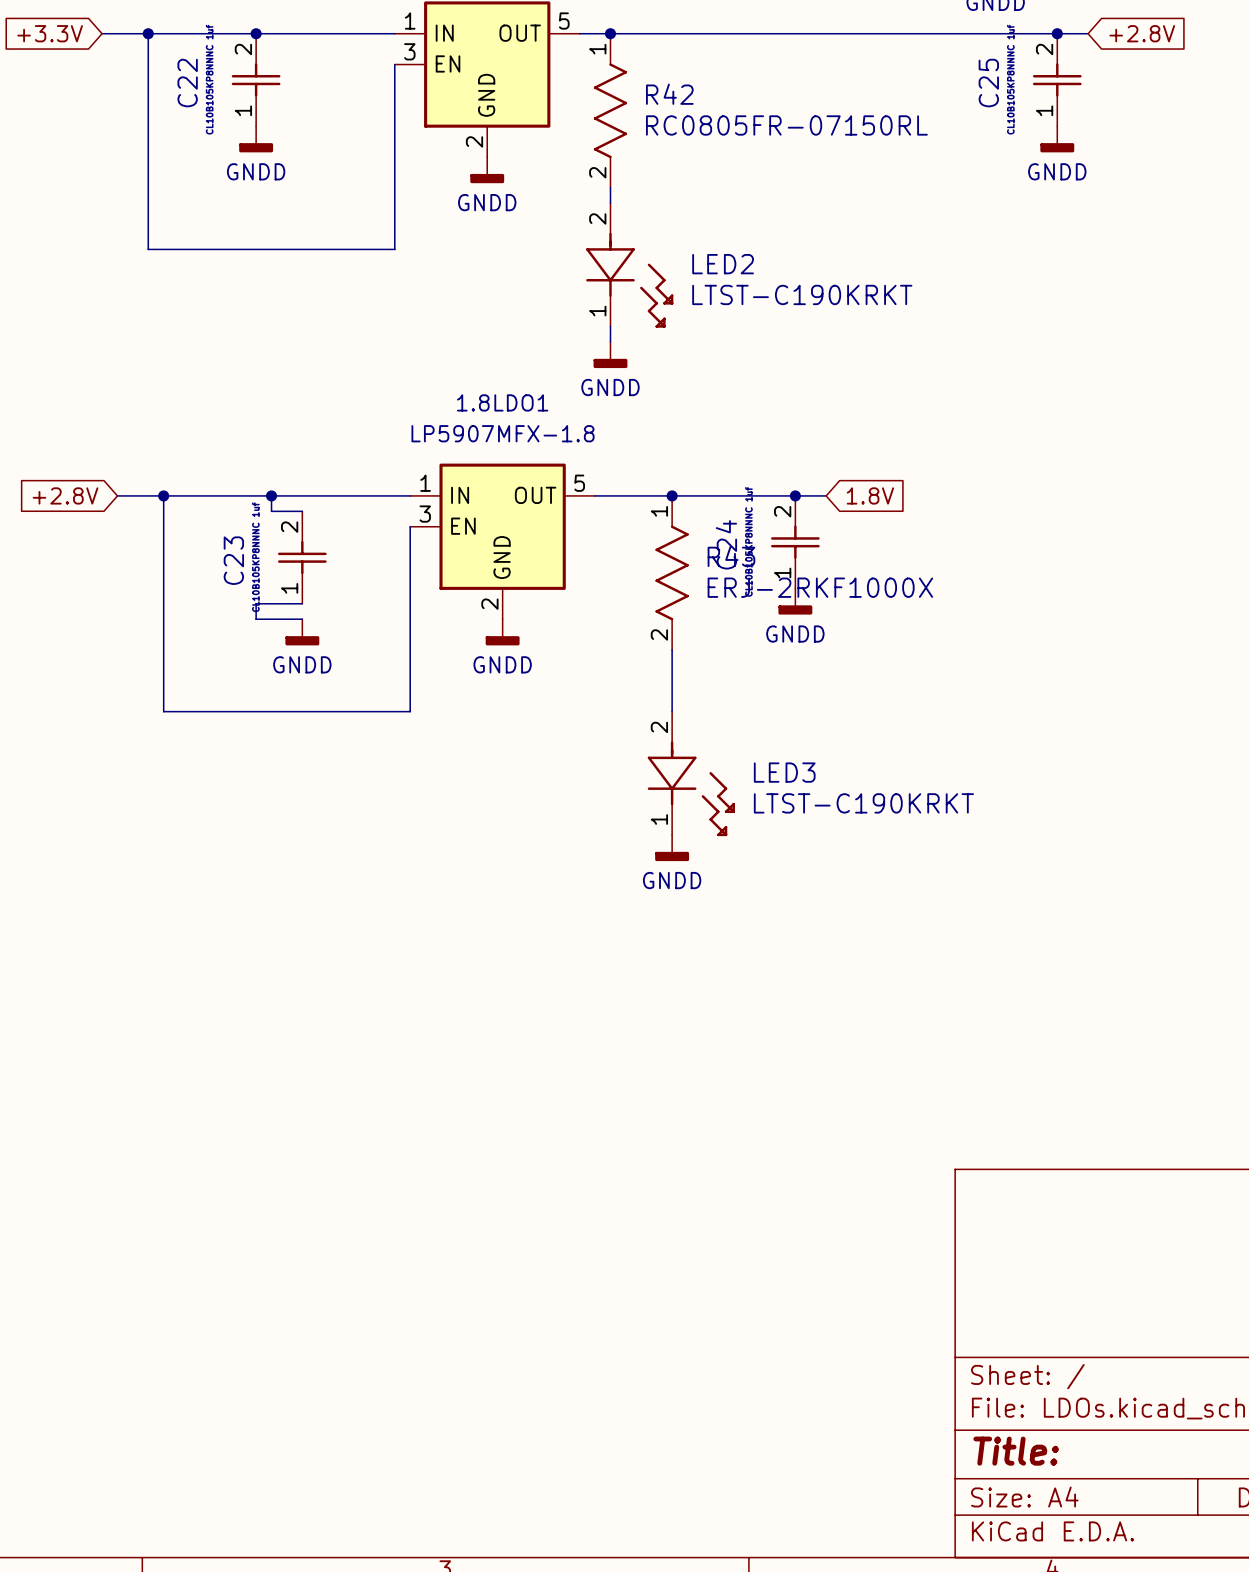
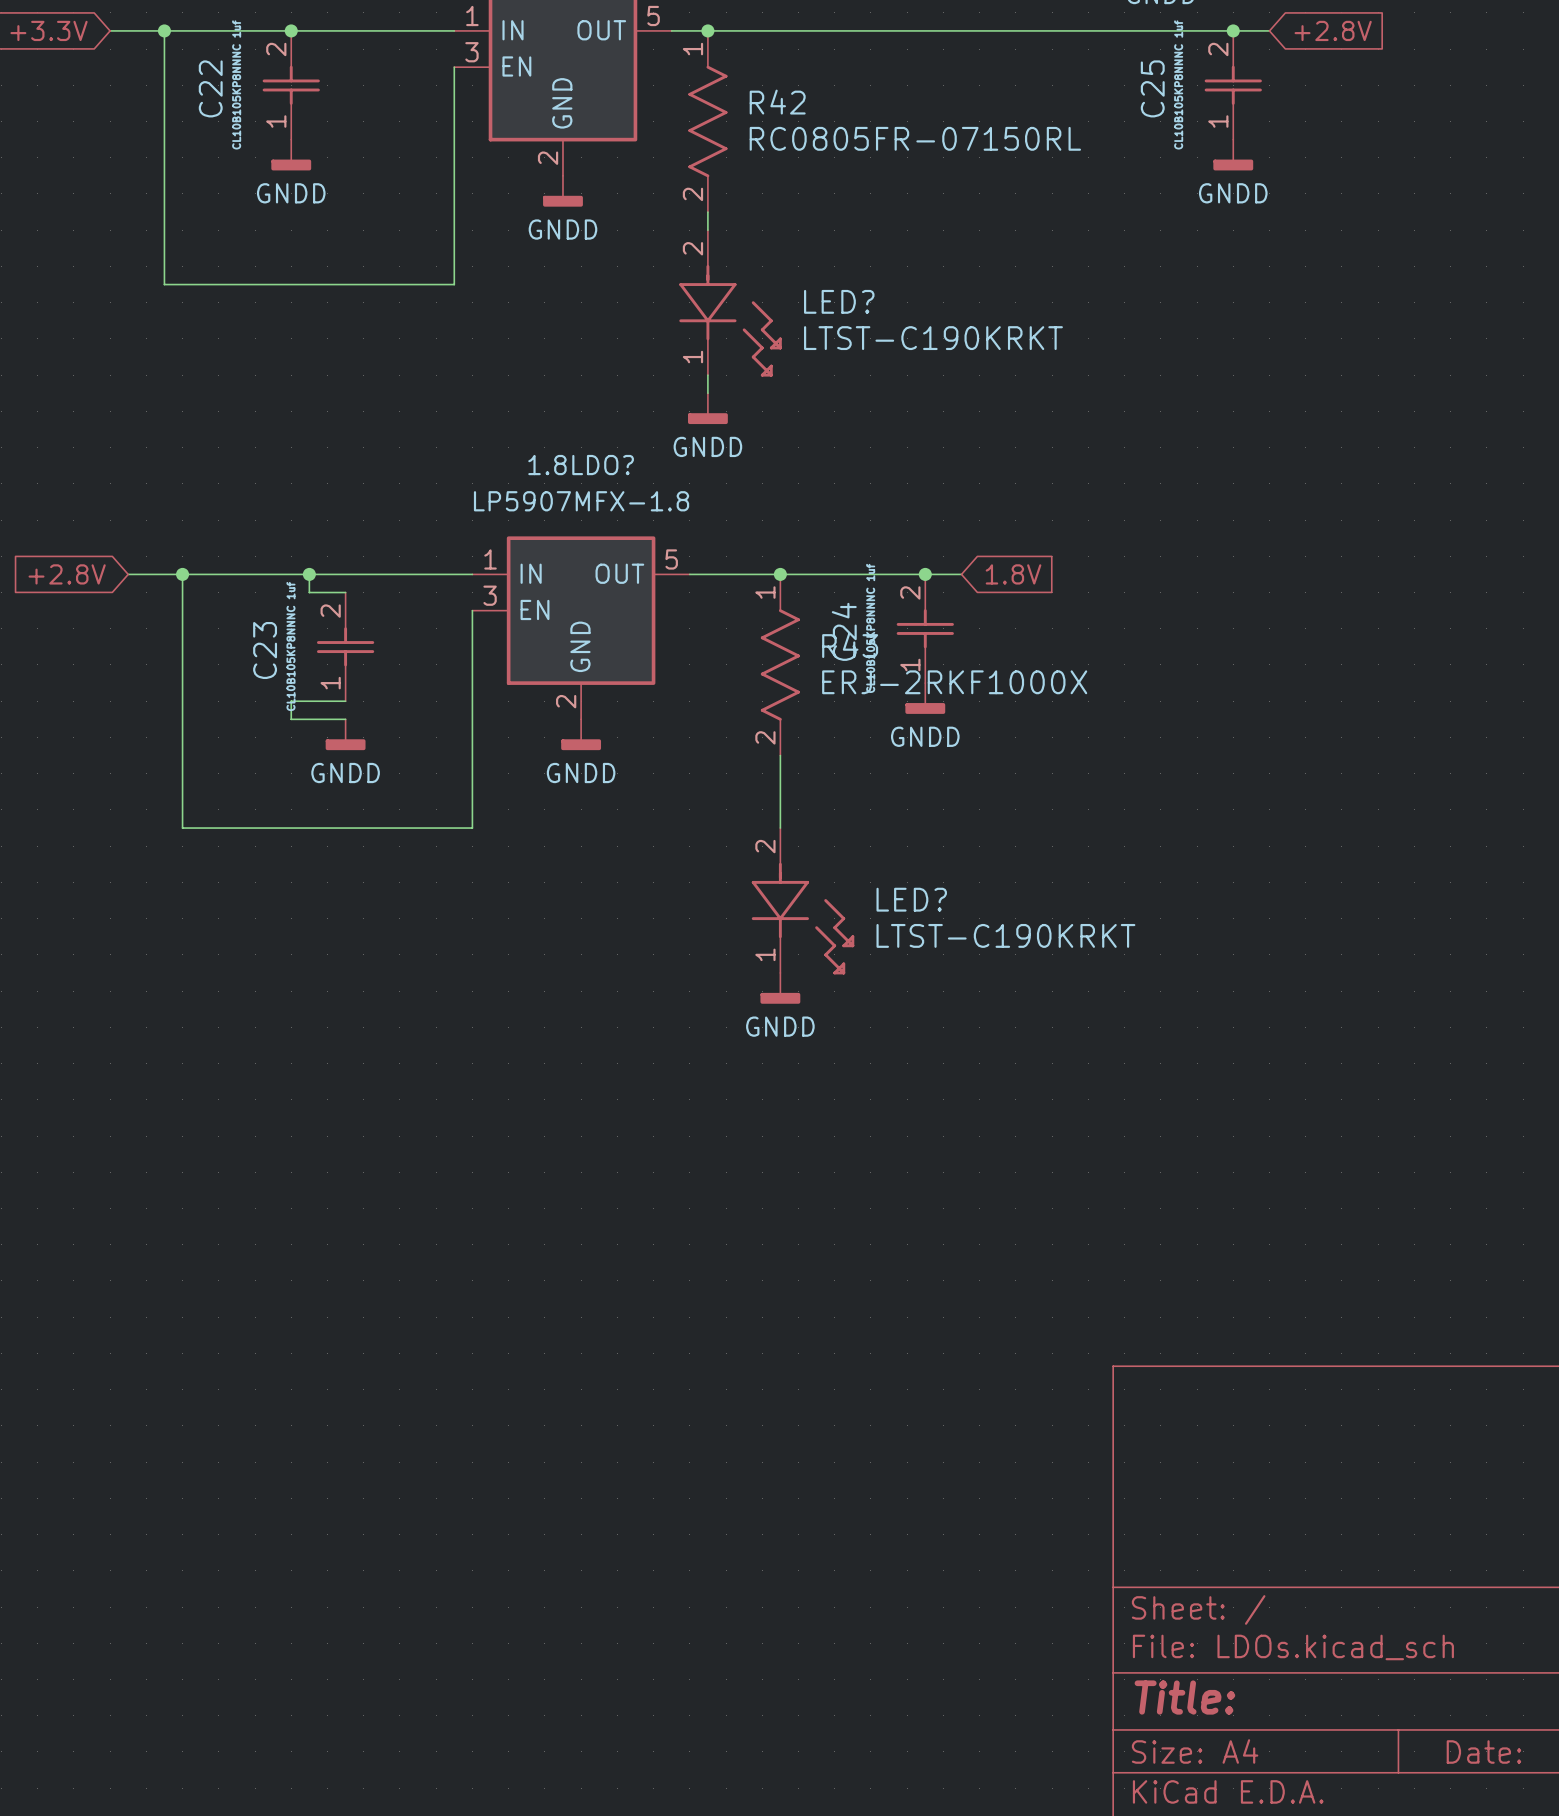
LED2 name: LED2 (723, 264) -> LED? (839, 301)
1.8LDO1 name: 1.8LDO1 (502, 402) -> 1.8LDO? (581, 465)
LED3 name: LED3 (784, 772) -> LED? (911, 899)

